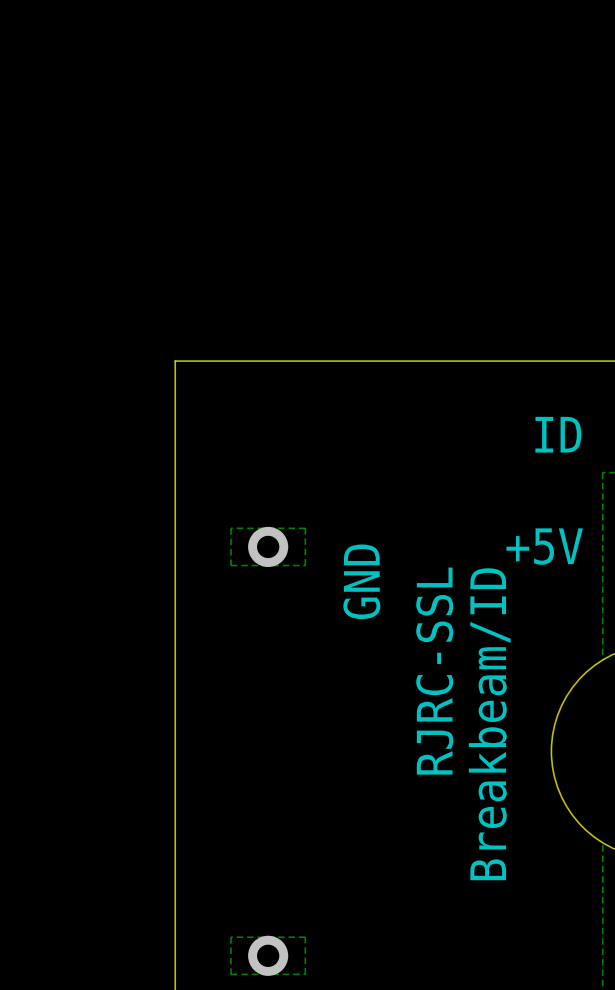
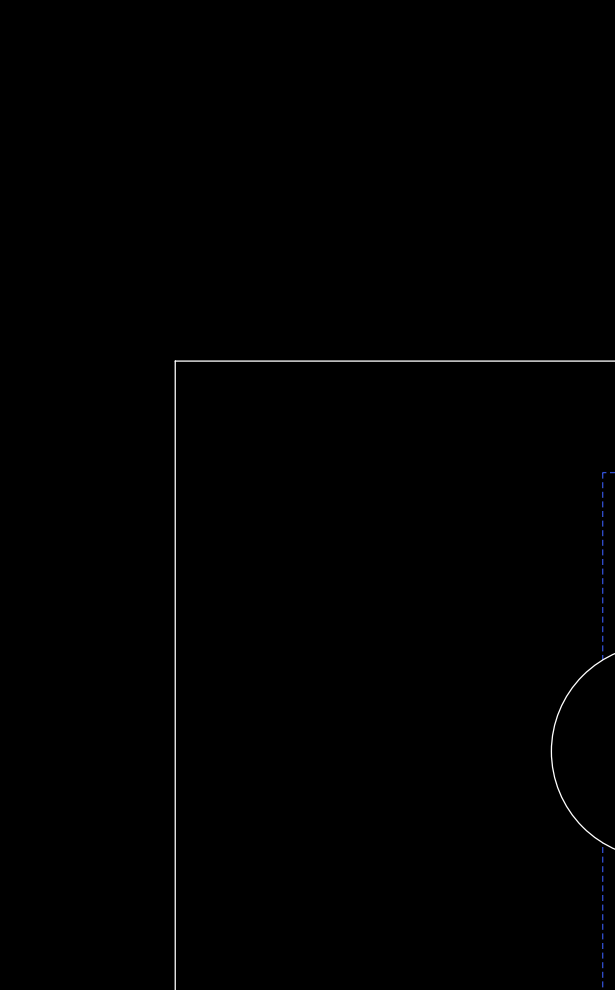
text: ID (558, 434) -> none
zone outline: (305, 528) (230, 528) (230, 565) (305, 565) (305, 528) -> none
via: (268, 546) -> none
text: +5V (544, 546) -> none
text: GND (361, 581) -> none
text: RJRC-SSL (434, 671) -> none
text: Breakbeam/ID (489, 724) -> none
zone outline: (305, 937) (305, 974) (230, 974) (230, 937) (305, 937) -> none
via: (268, 955) -> none

